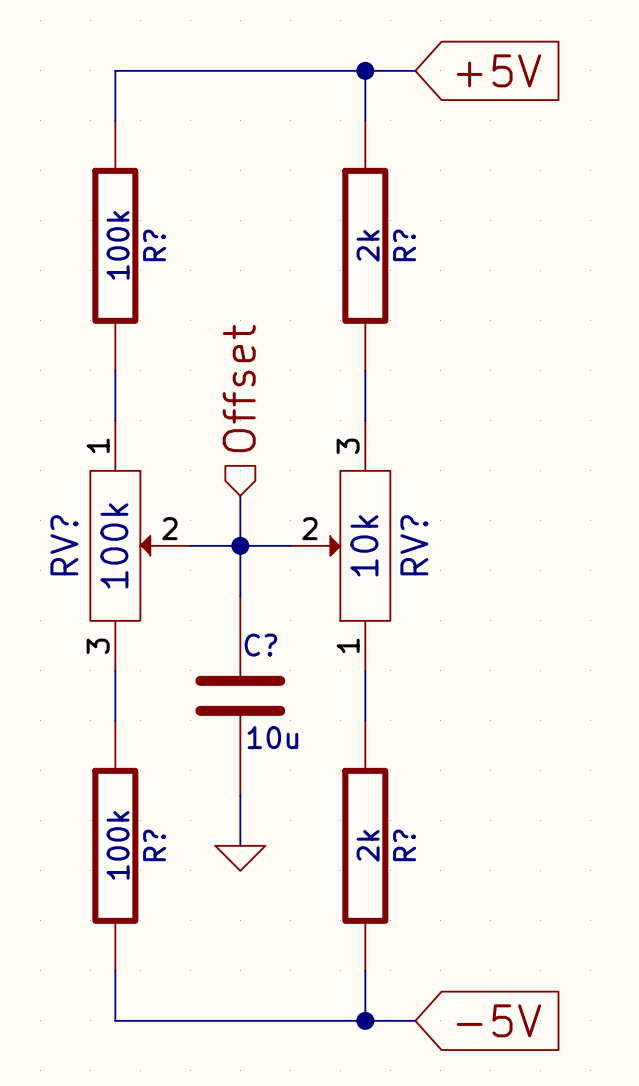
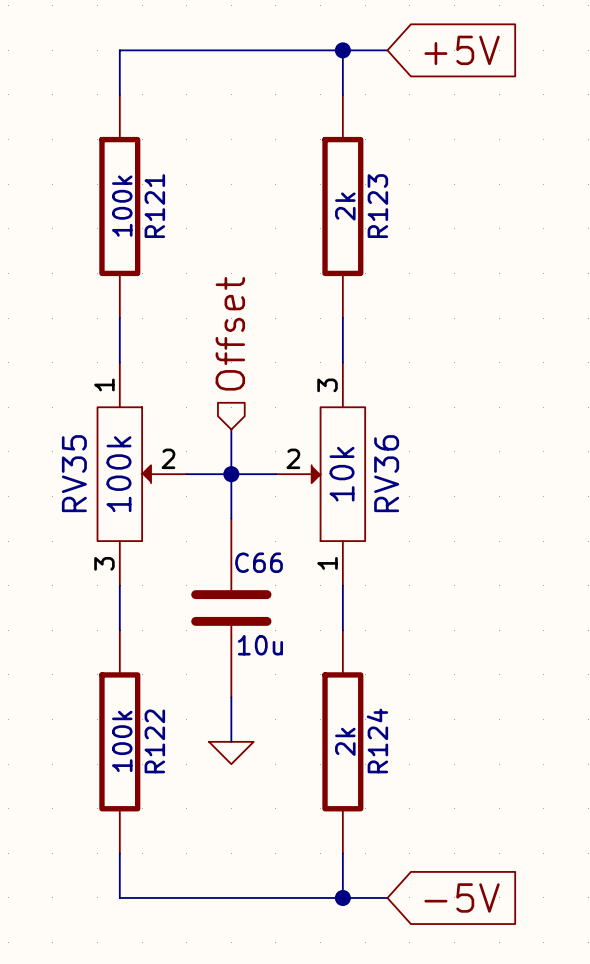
R? name: R? (154, 245) -> R121 (154, 206)
R? name: R? (404, 245) -> R123 (377, 206)
RV? name: RV? (64, 545) -> RV35 (74, 473)
RV? name: RV? (414, 545) -> RV36 (386, 473)
C? name: C? (260, 645) -> C66 (259, 562)
R? name: R? (154, 845) -> R122 (154, 741)
R? name: R? (404, 845) -> R124 (377, 740)

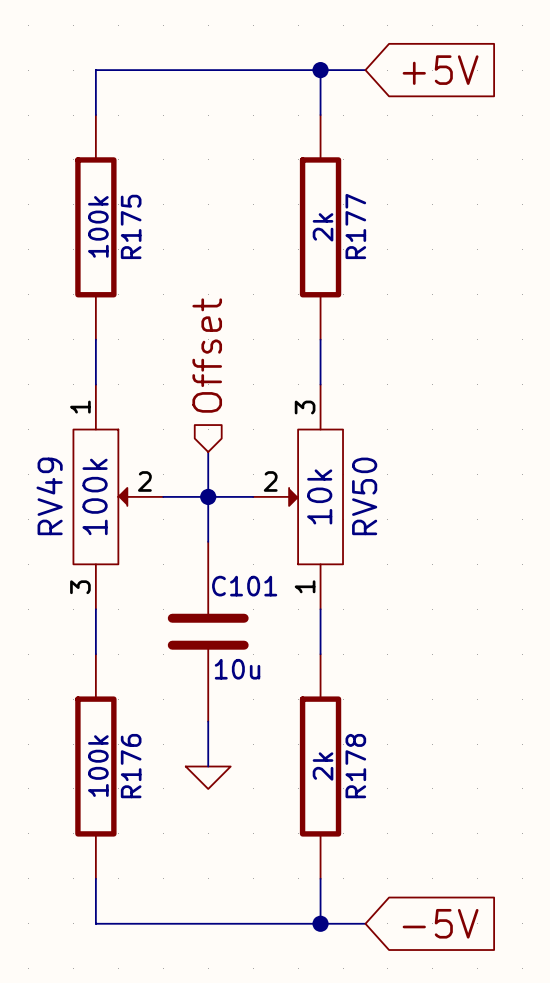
R121 name: R121 (154, 206) -> R175 (131, 226)
R123 name: R123 (377, 206) -> R177 (355, 226)
RV35 name: RV35 (74, 473) -> RV49 (49, 496)
RV36 name: RV36 (386, 473) -> RV50 (364, 496)
C66 name: C66 (259, 562) -> C101 (244, 586)
R124 name: R124 (377, 740) -> R178 (355, 766)
R122 name: R122 (154, 741) -> R176 (131, 766)

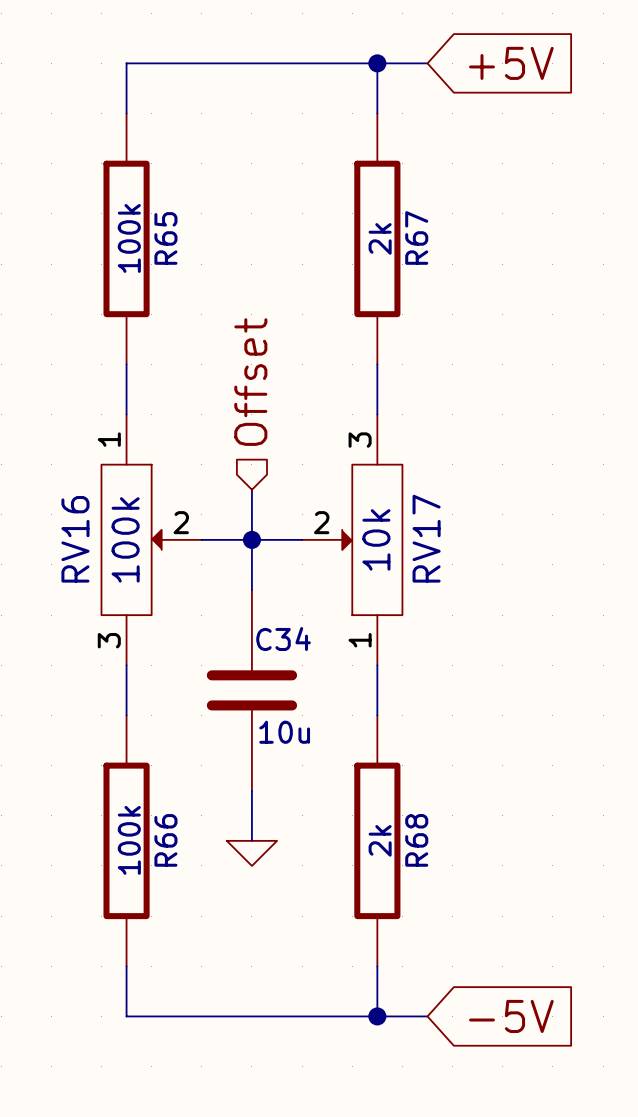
R175 name: R175 (131, 226) -> R65 (165, 238)
R177 name: R177 (355, 226) -> R67 (416, 237)
RV49 name: RV49 (49, 496) -> RV16 (75, 539)
RV50 name: RV50 (364, 496) -> RV17 (426, 538)
C101 name: C101 (244, 586) -> C34 (283, 639)
R176 name: R176 (131, 766) -> R66 (165, 840)
R178 name: R178 (355, 766) -> R68 (416, 840)

